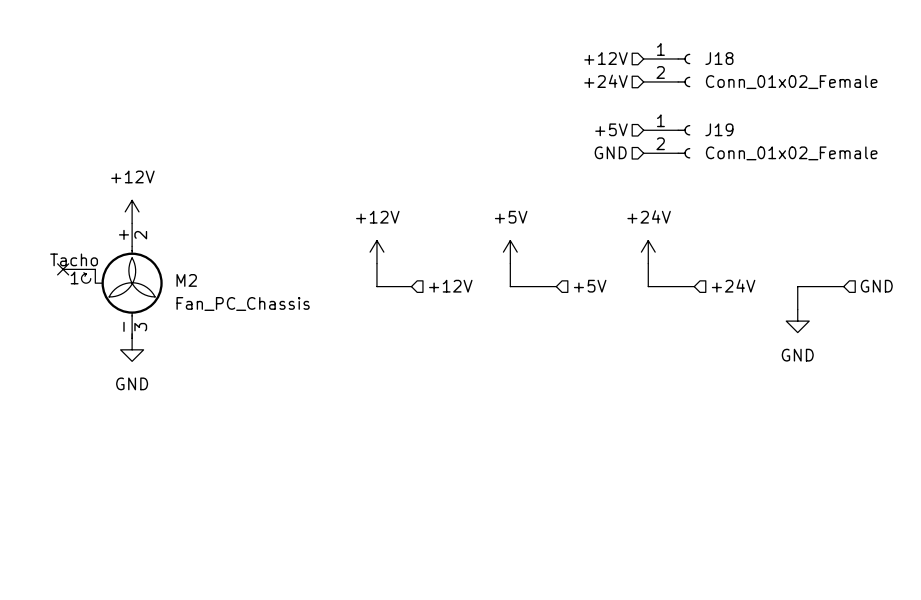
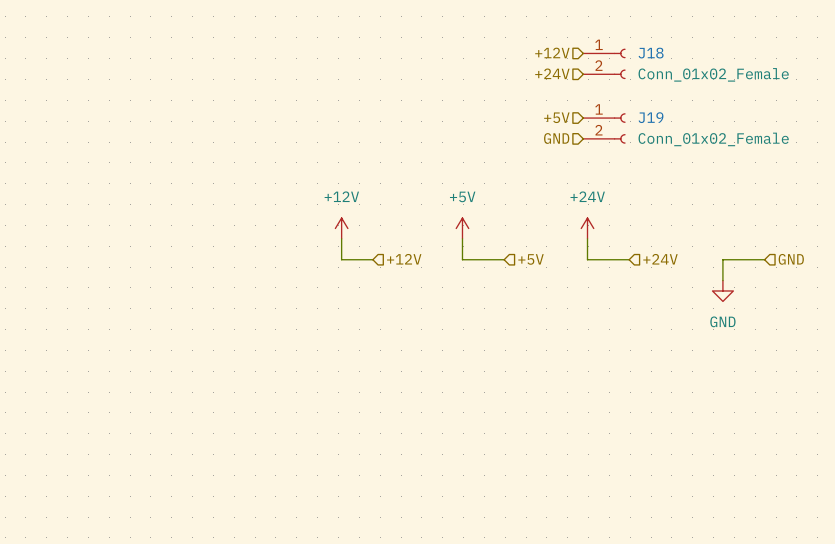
power symbol: +12V (132, 211) -> none
no-connect mark: (63, 269) -> none
M2: Fan_PC_Chassis (112, 280) -> none
power symbol: GND (132, 349) -> none

